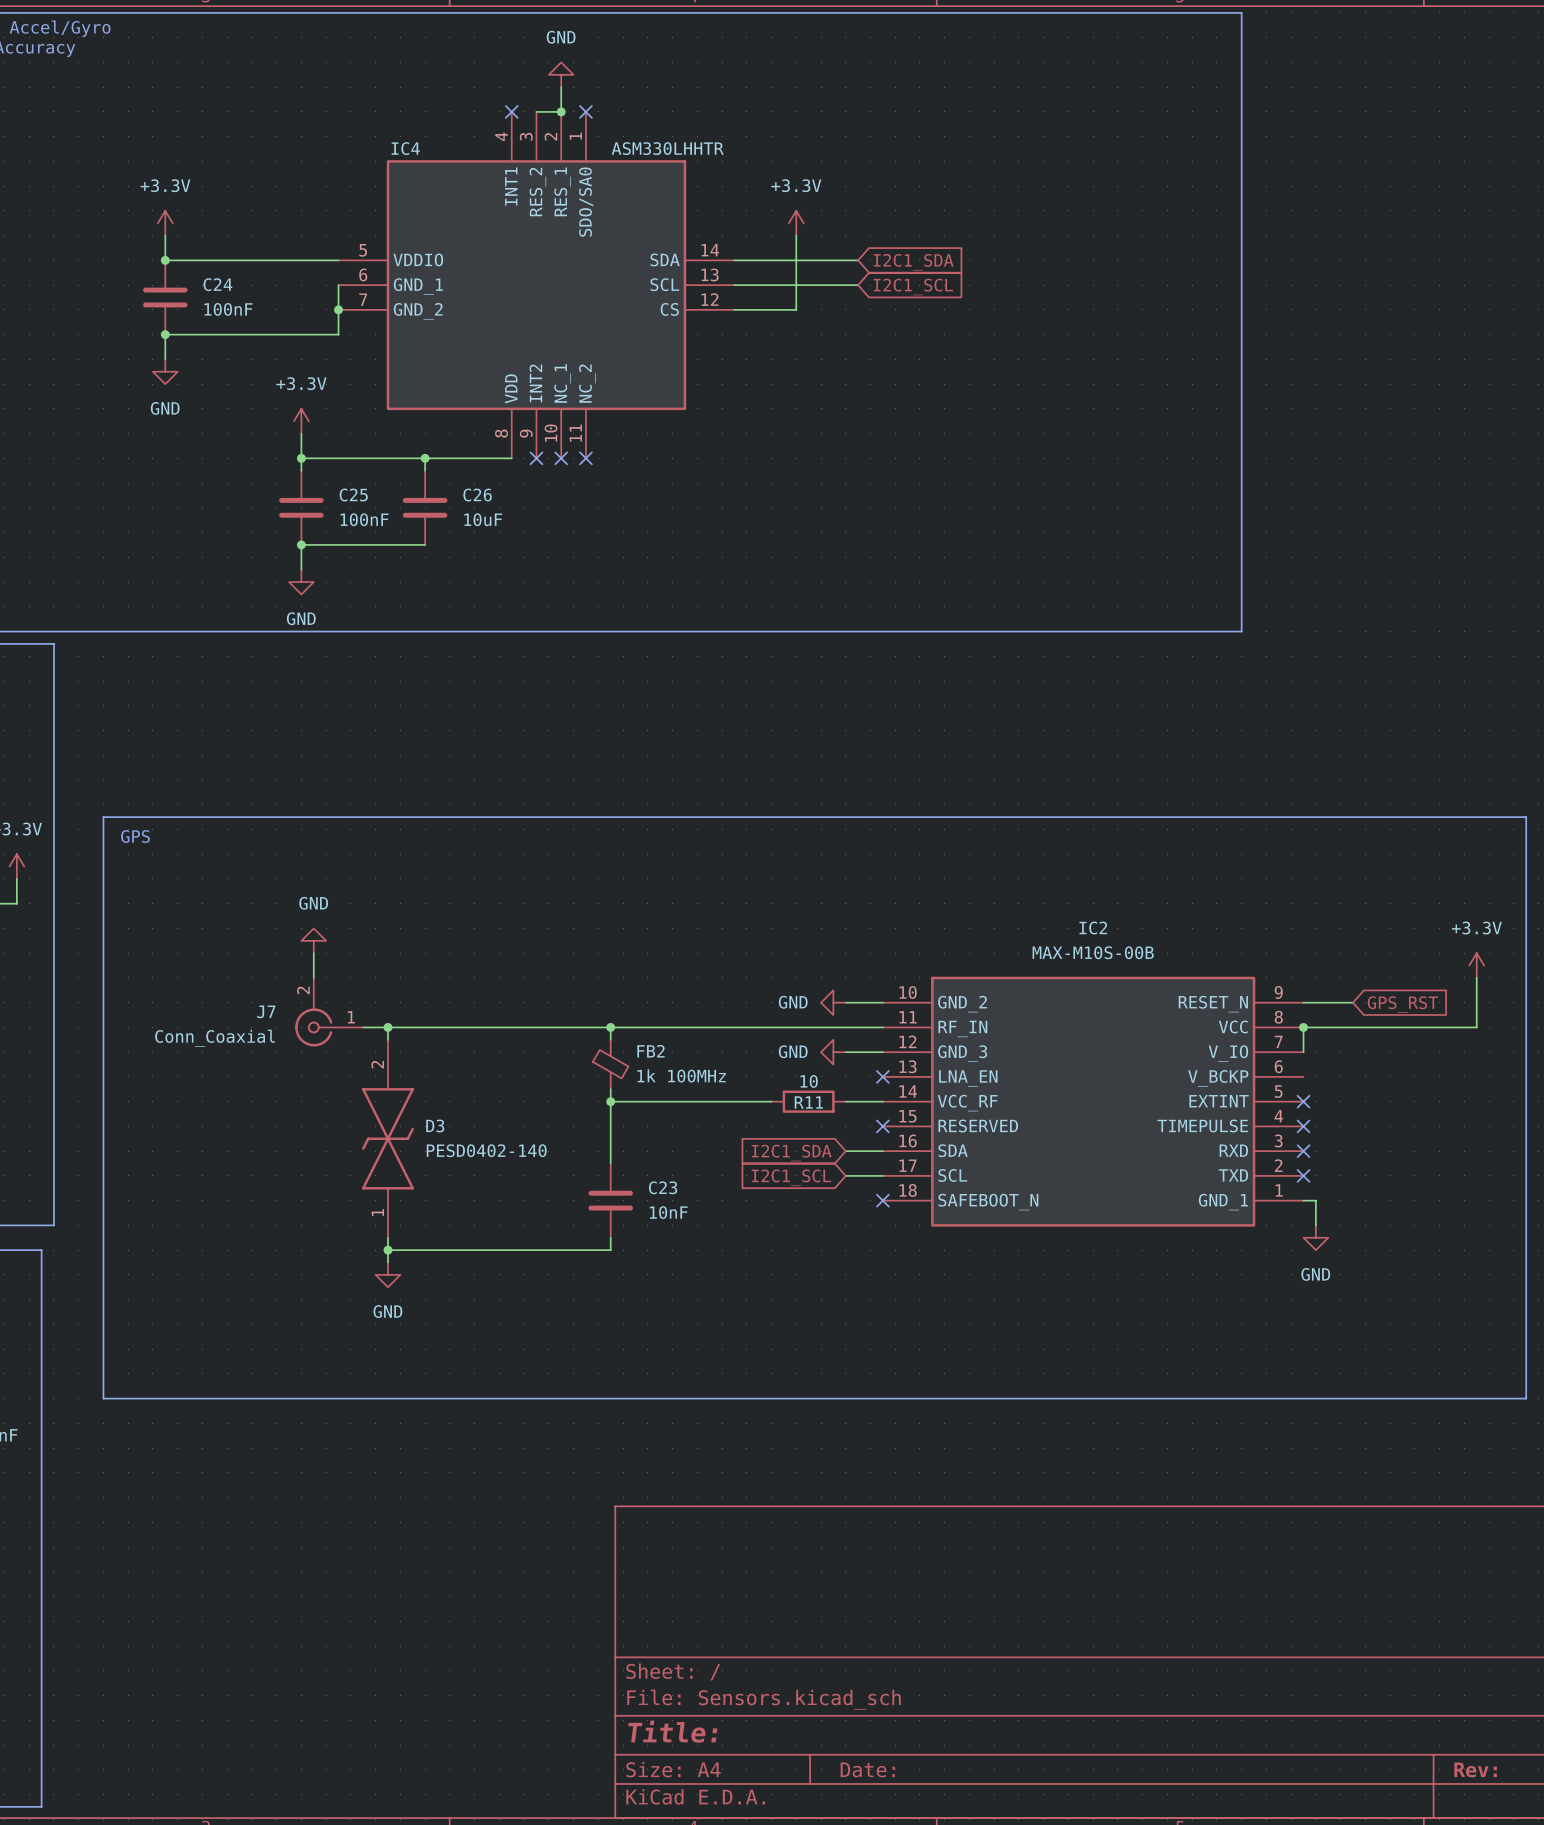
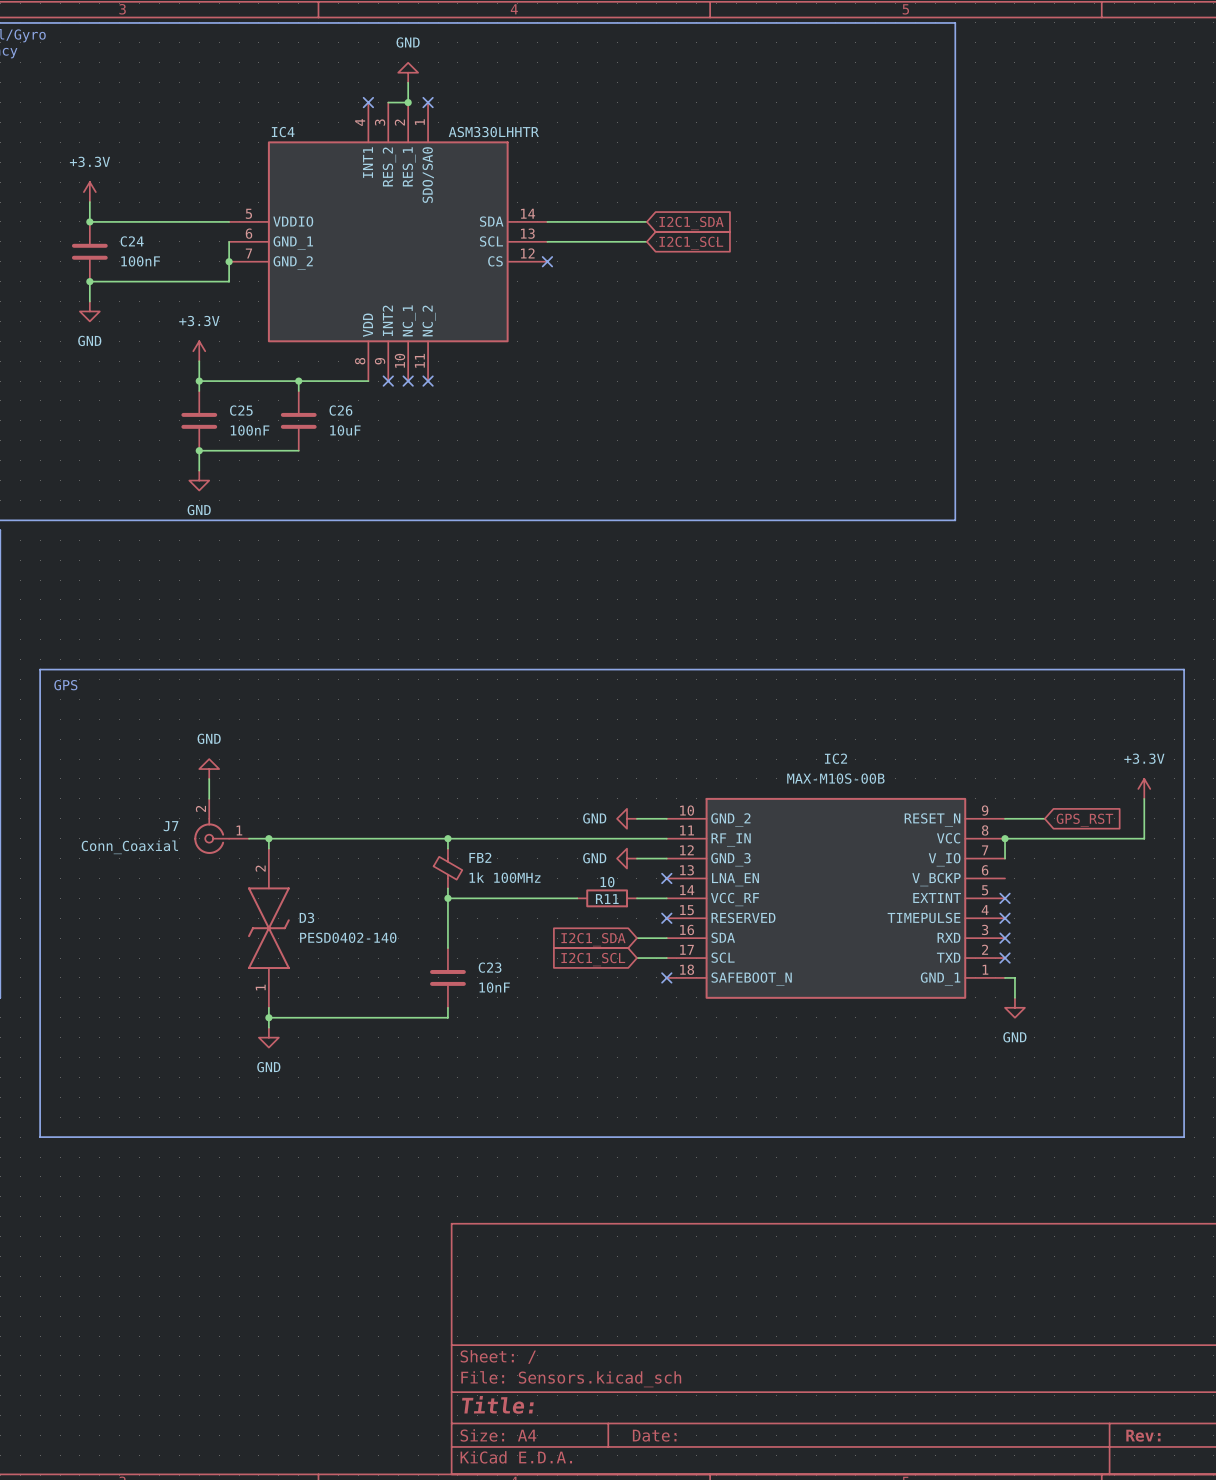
power symbol: +3.3V (796, 223) -> none
wire: (796, 235) (796, 309) (734, 309) -> none
no-connect mark: none -> (547, 261)

